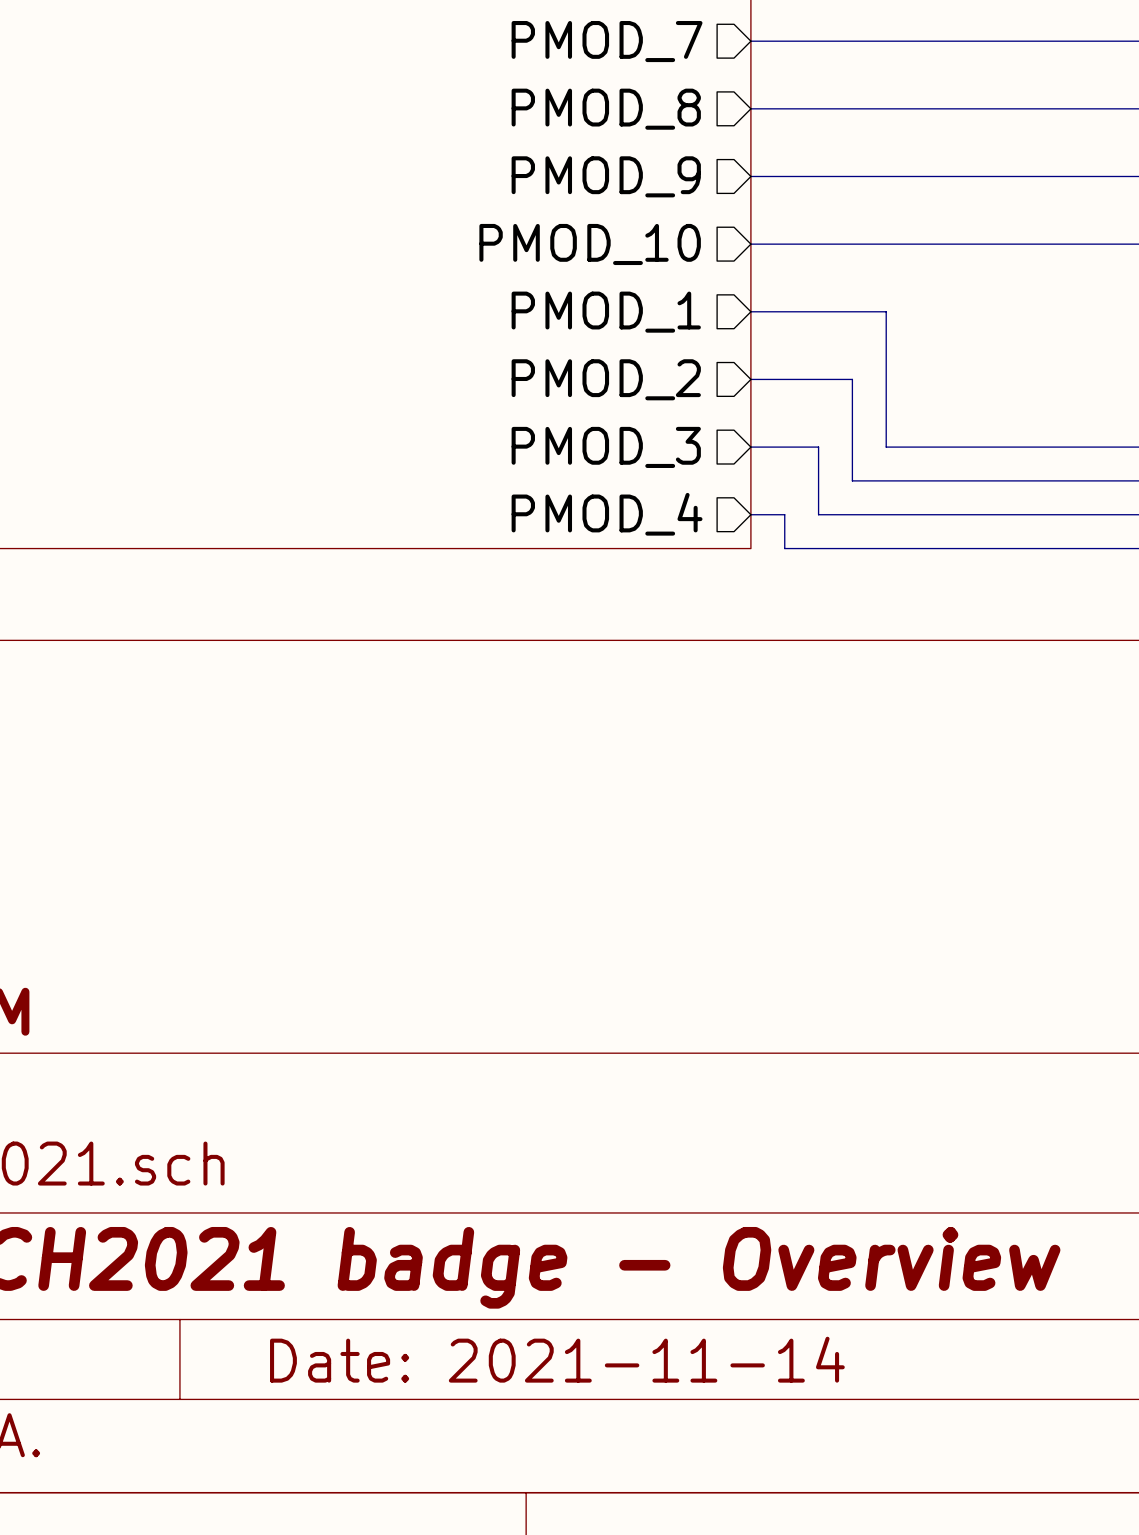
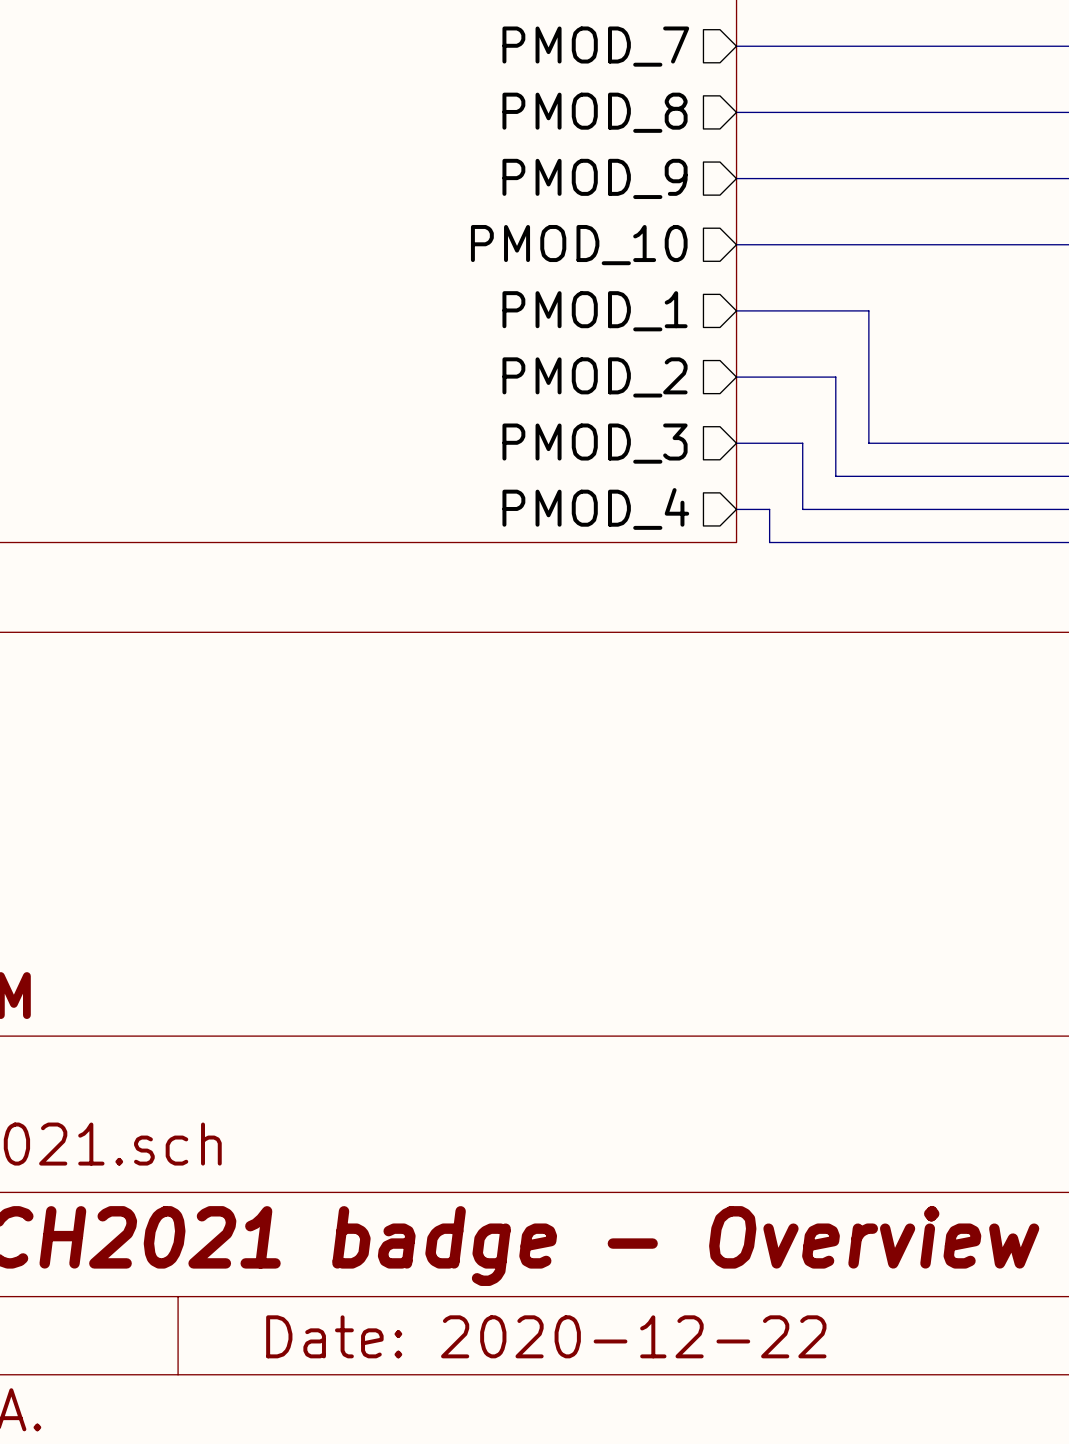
title block: Date: 2021-11-14 (557, 1359) -> Date: 2020-12-22 (546, 1336)

